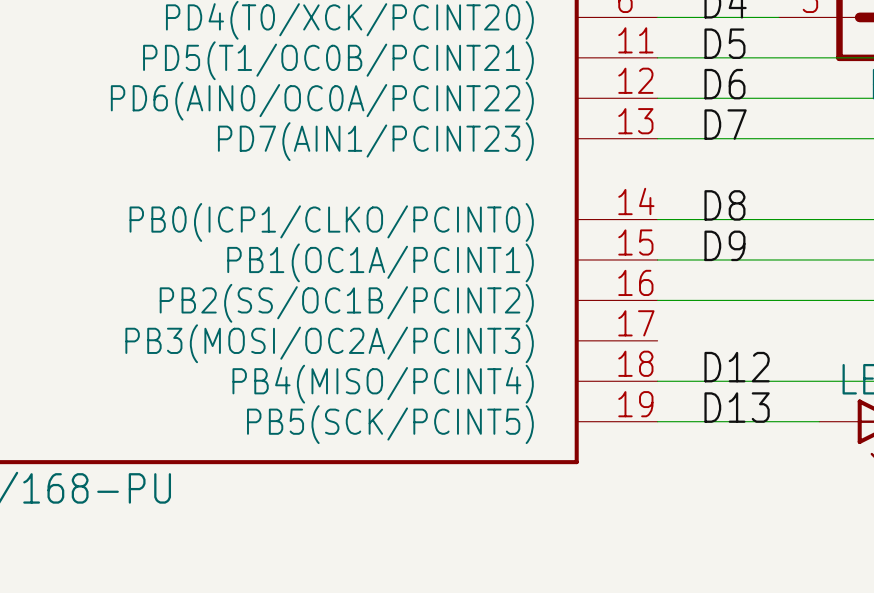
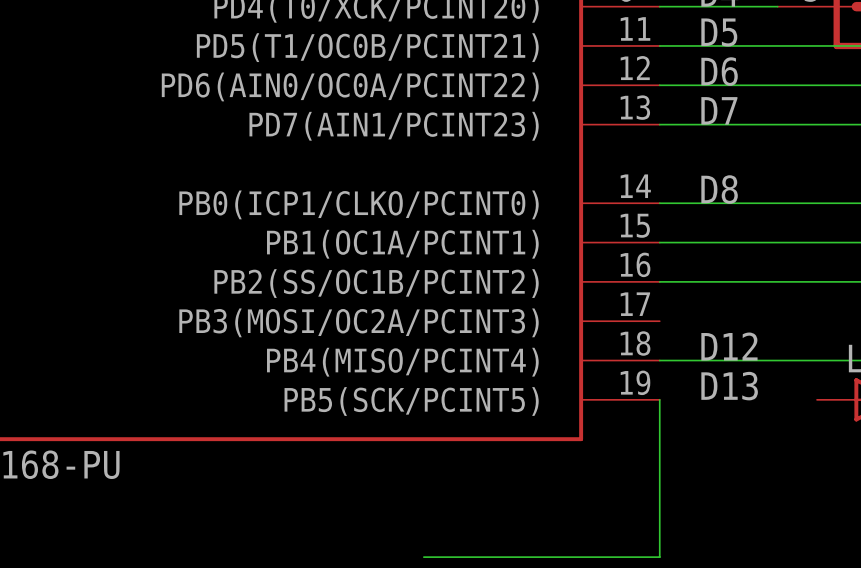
label: D9 (724, 245) -> none
wire: (657, 421) (819, 421) -> (659, 399) (659, 557) (423, 557)

